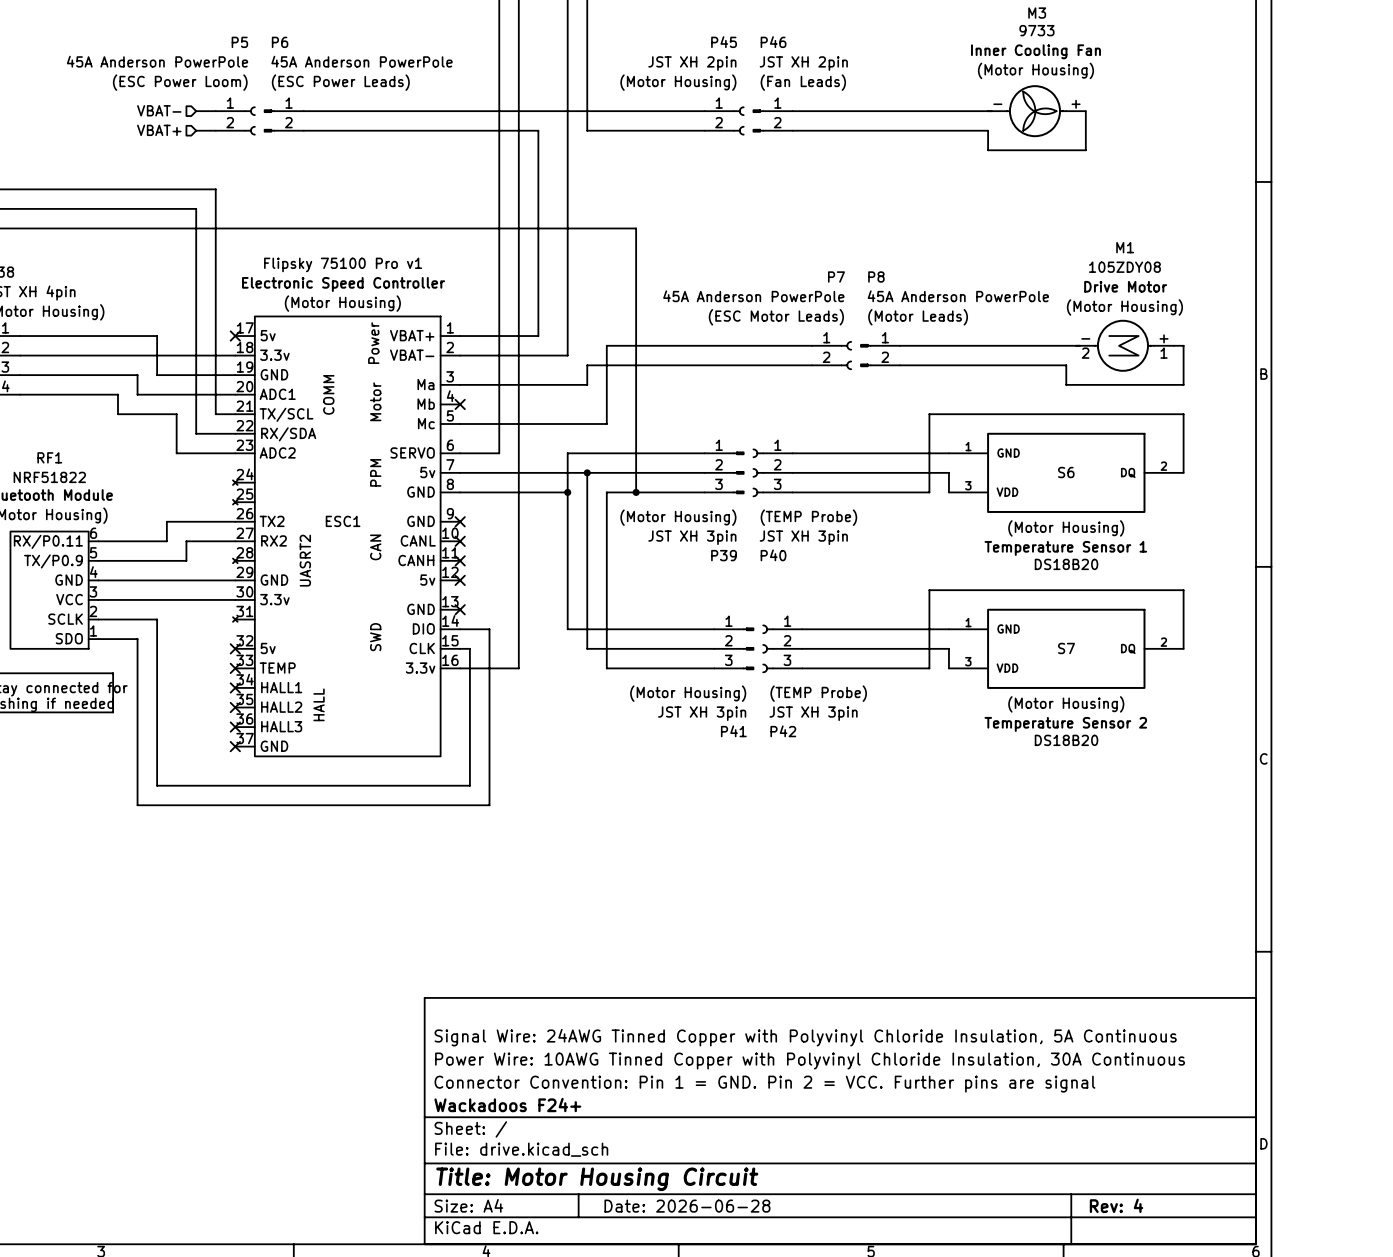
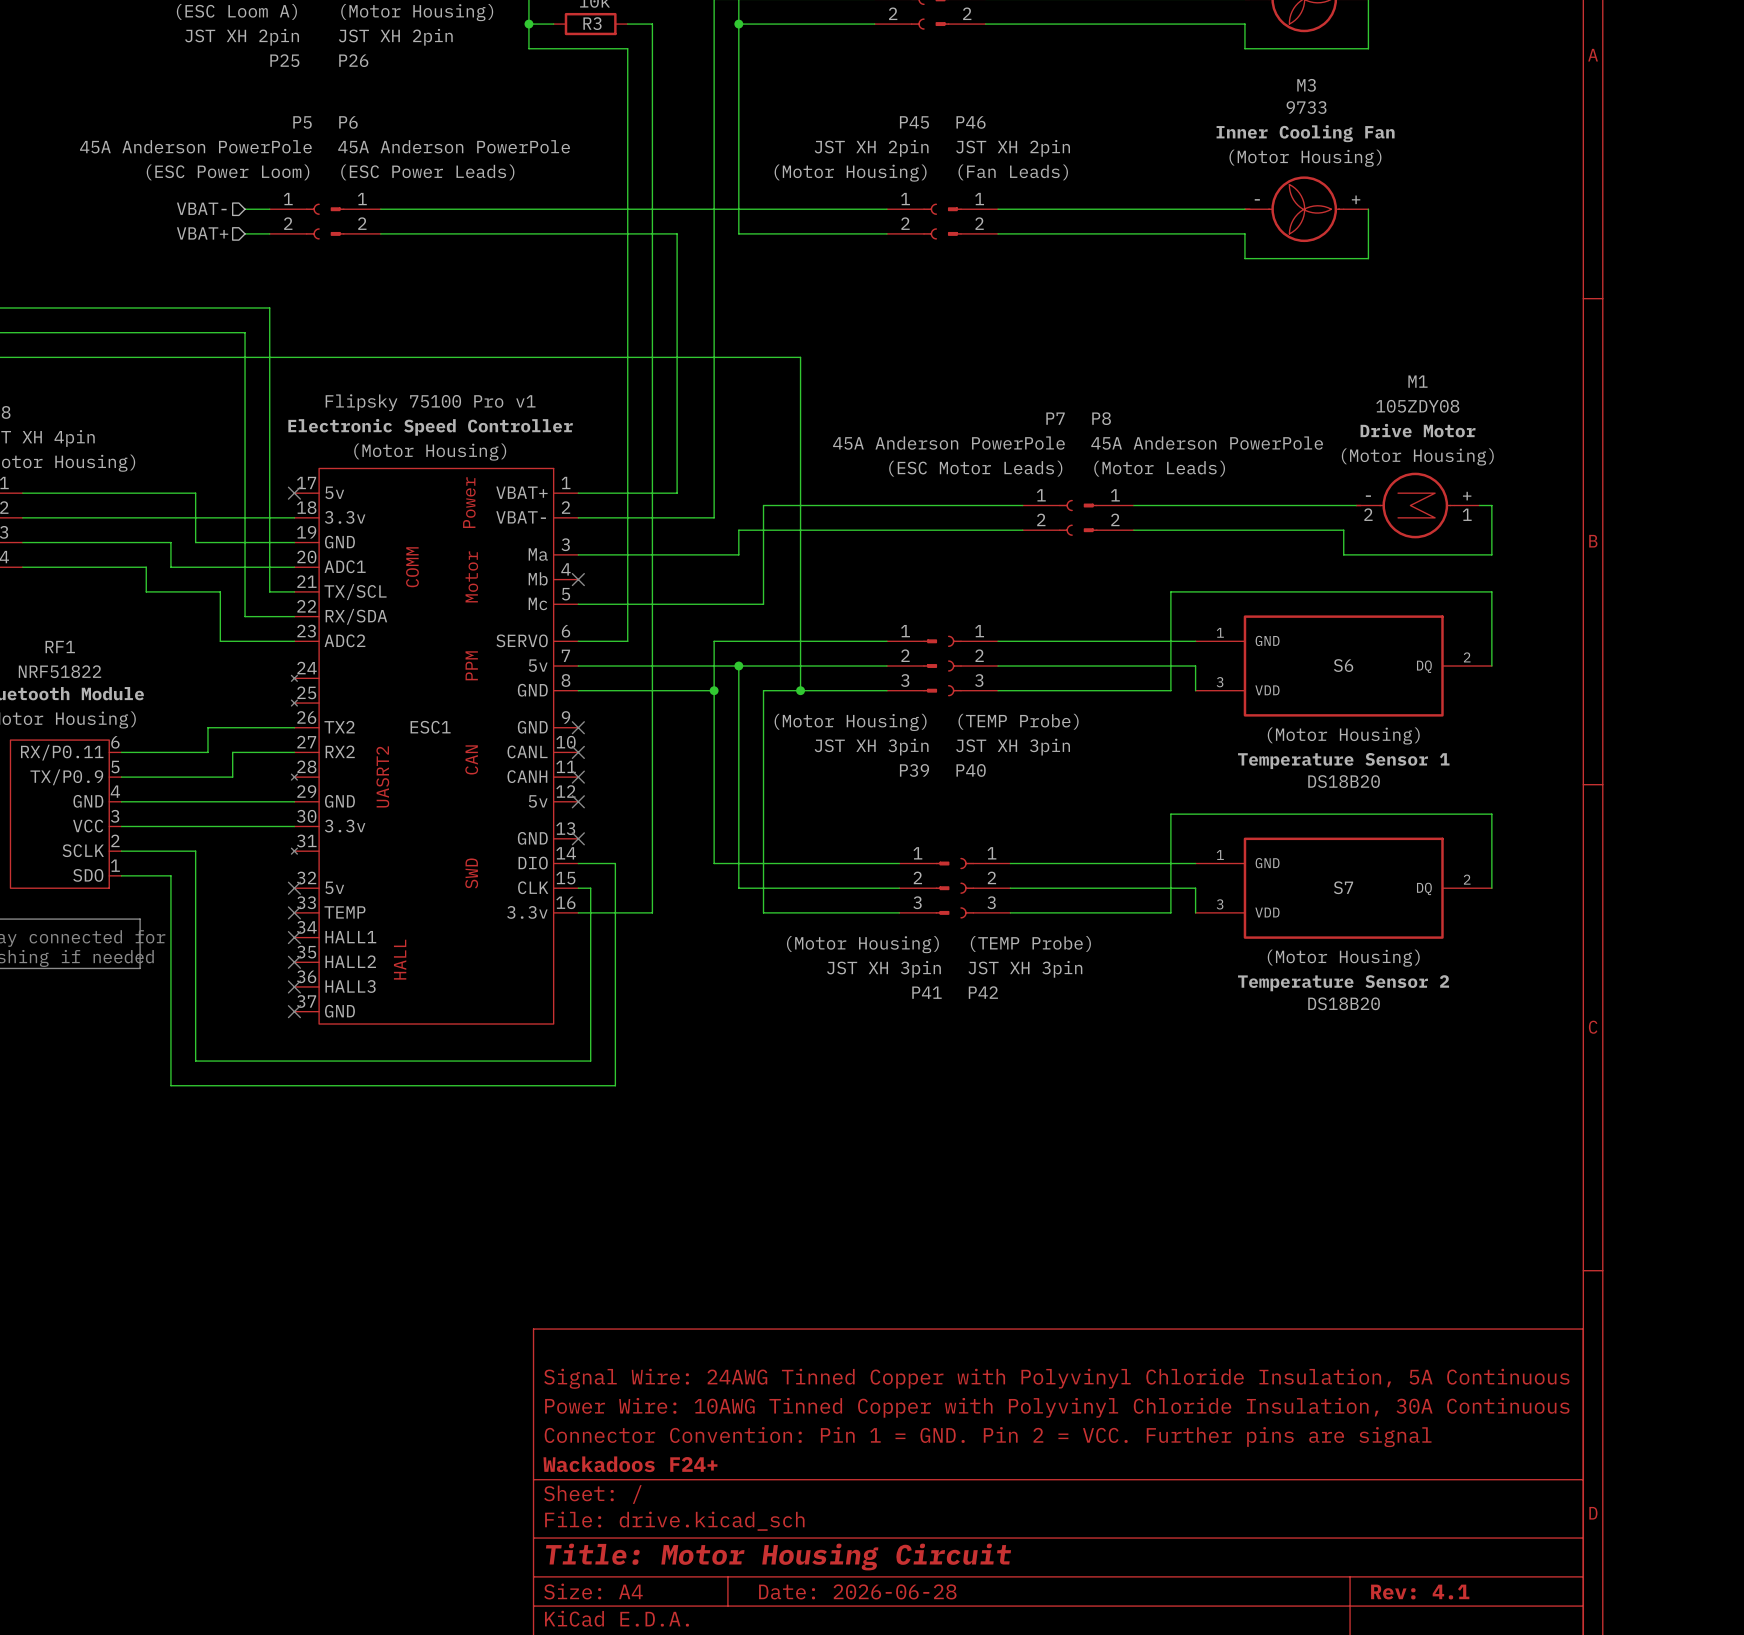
title block: Rev: 4 (1116, 1205) -> Rev: 4.1 (1420, 1592)

